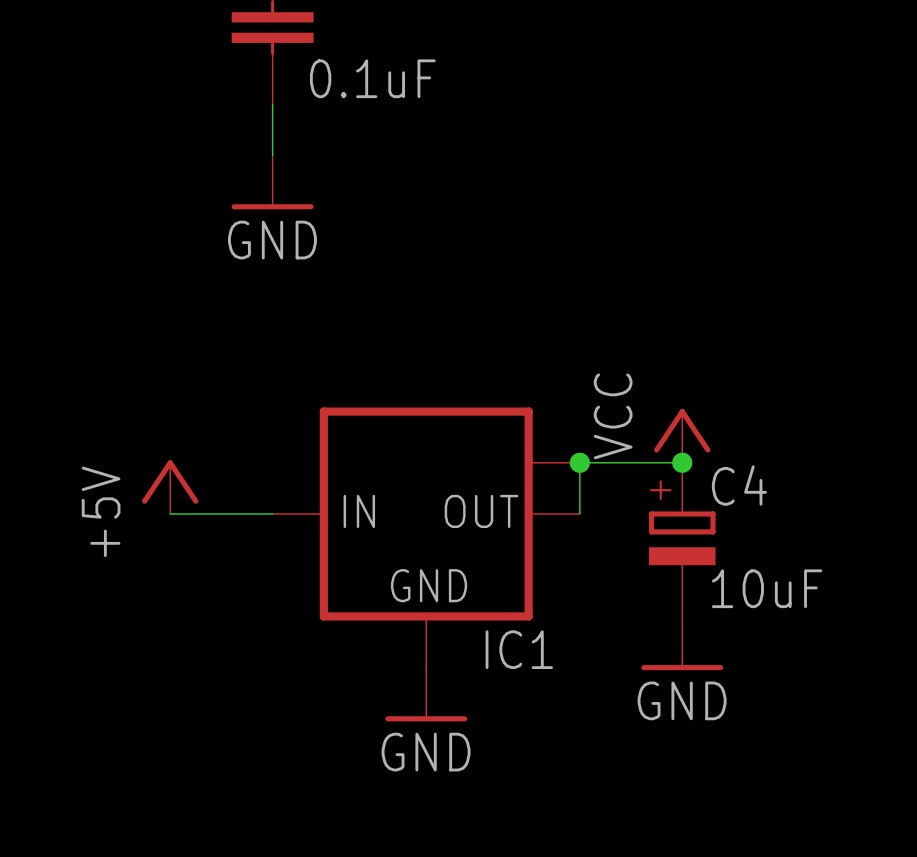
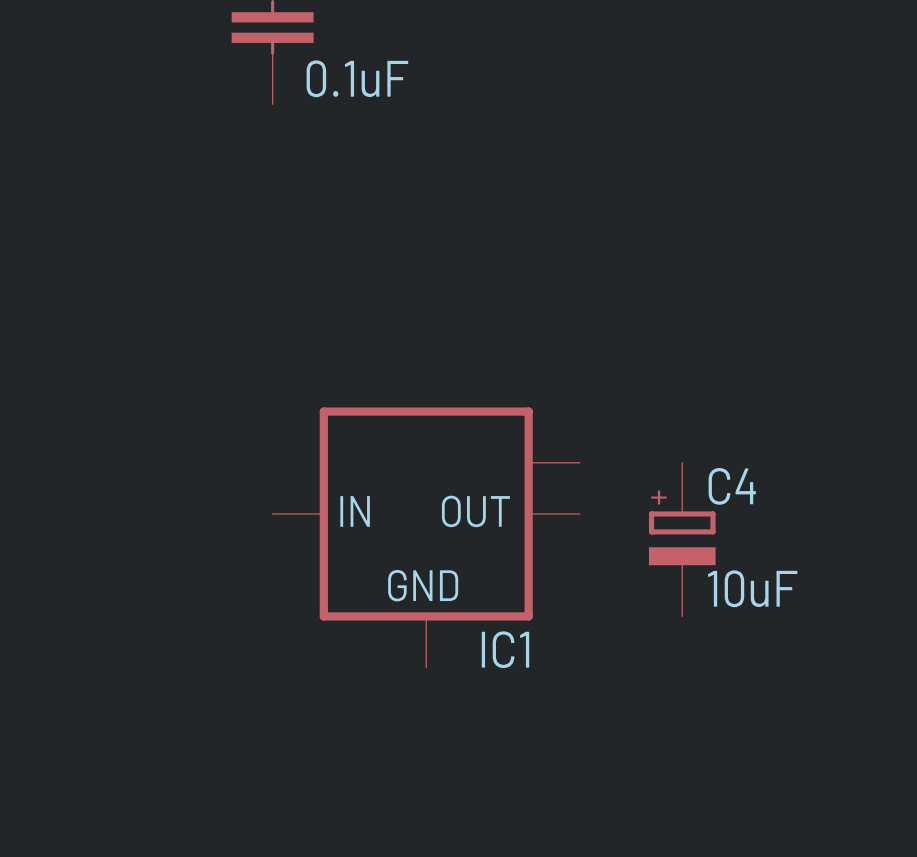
wire: (272, 104) (272, 155) -> none
power symbol: GND (272, 182) -> none
power symbol: VCC (682, 435) -> none
junction: (579, 462) -> none
wire: (682, 462) (579, 462) (579, 513) -> none
junction: (682, 462) -> none
power symbol: +5V (170, 487) -> none
wire: (170, 513) (272, 513) -> none
power symbol: GND (682, 643) -> none
power symbol: GND (426, 694) -> none

